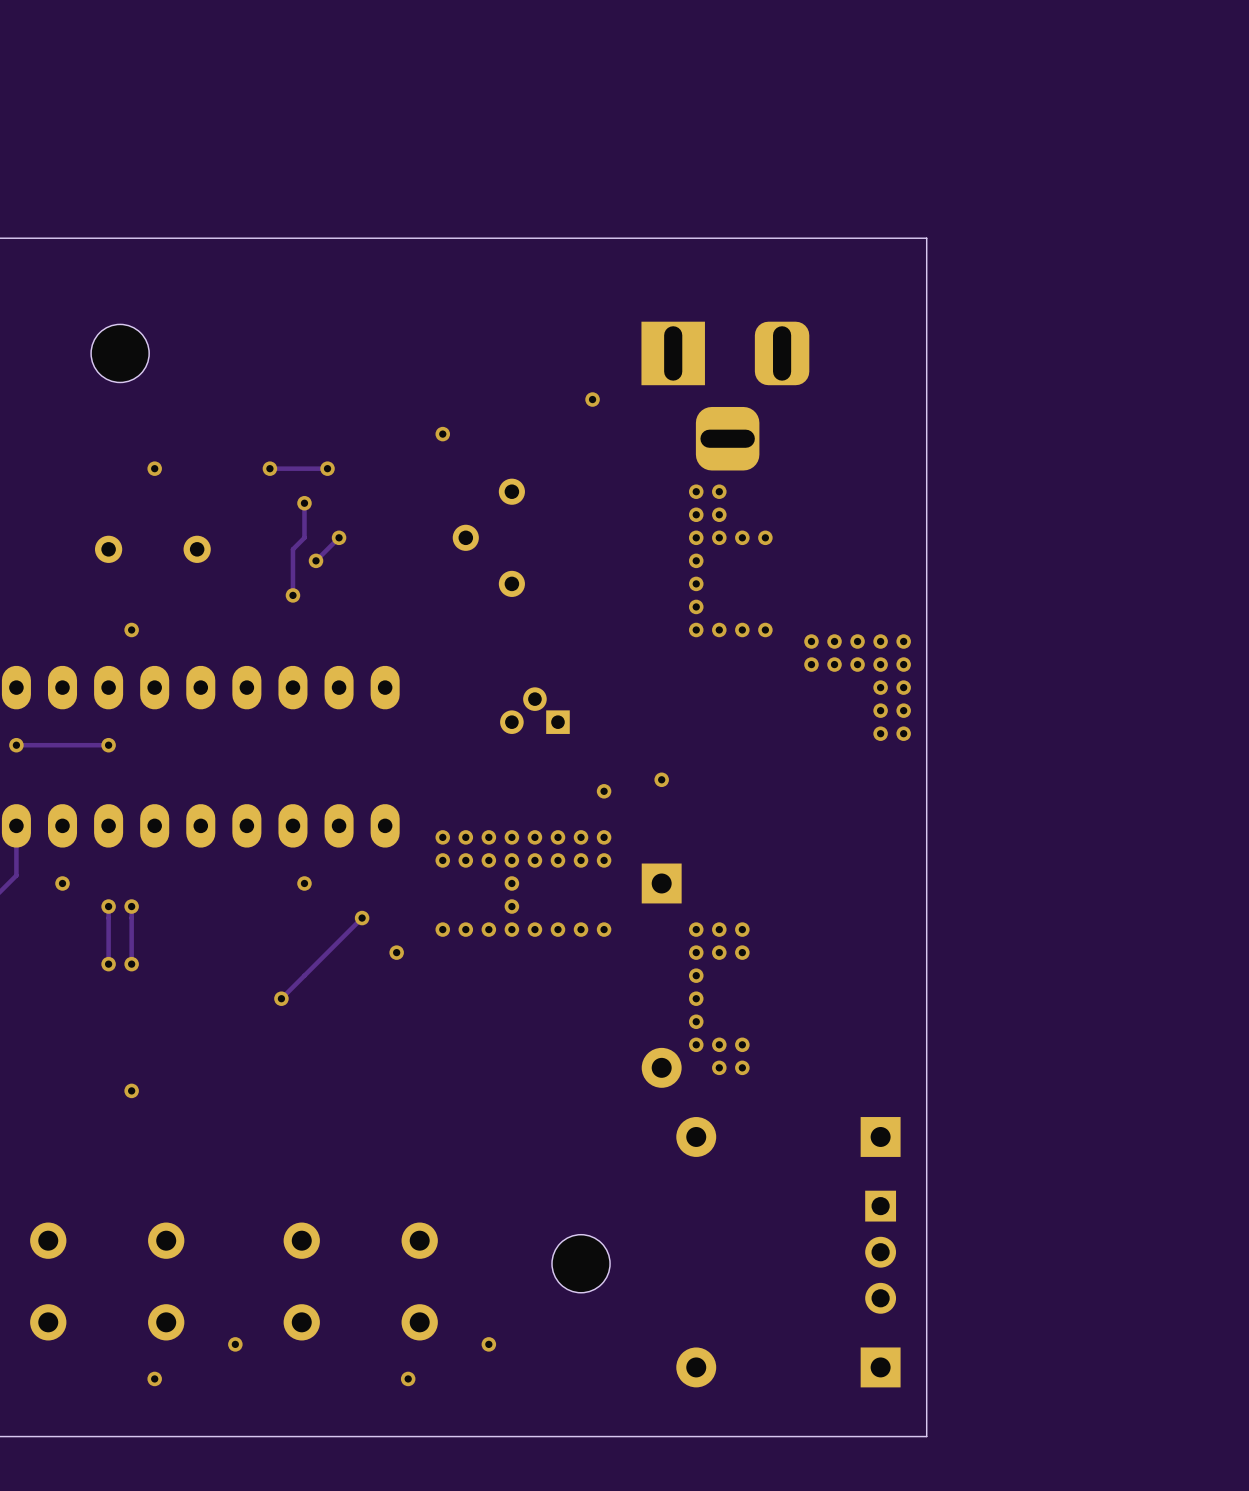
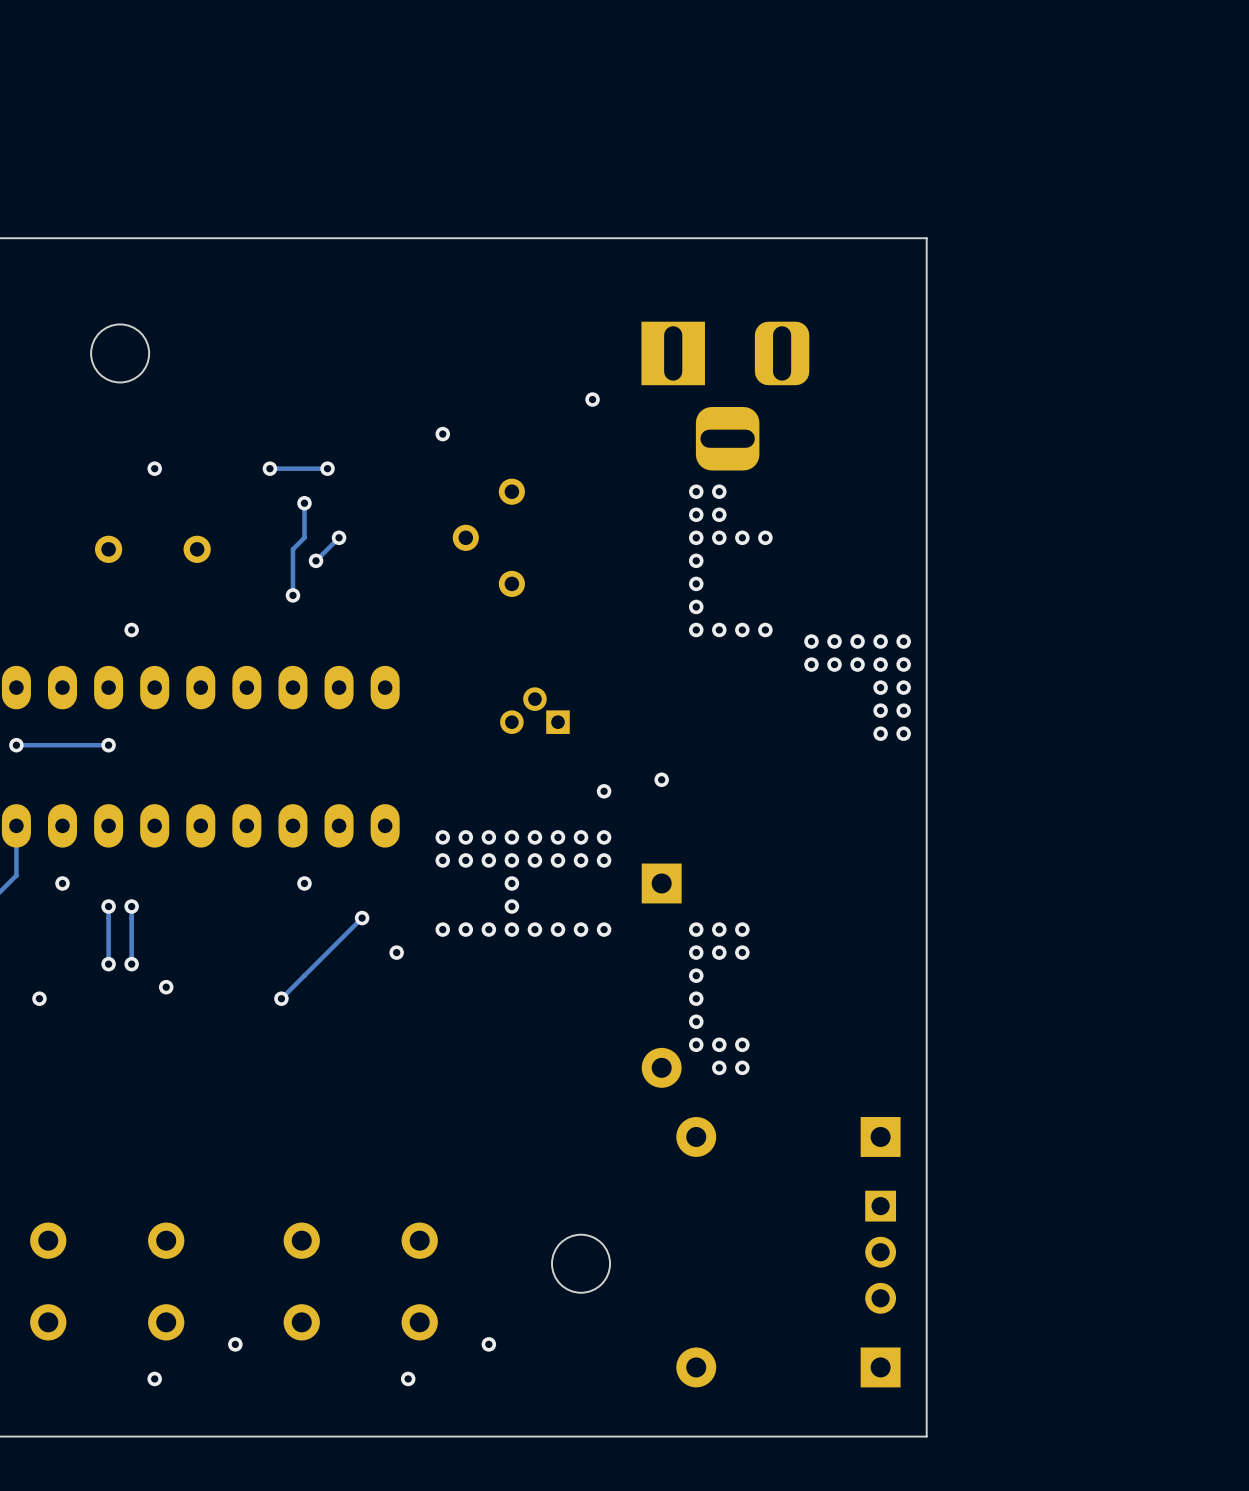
via: none -> (166, 987)
via: none -> (39, 998)
via: (131, 1090) -> none

